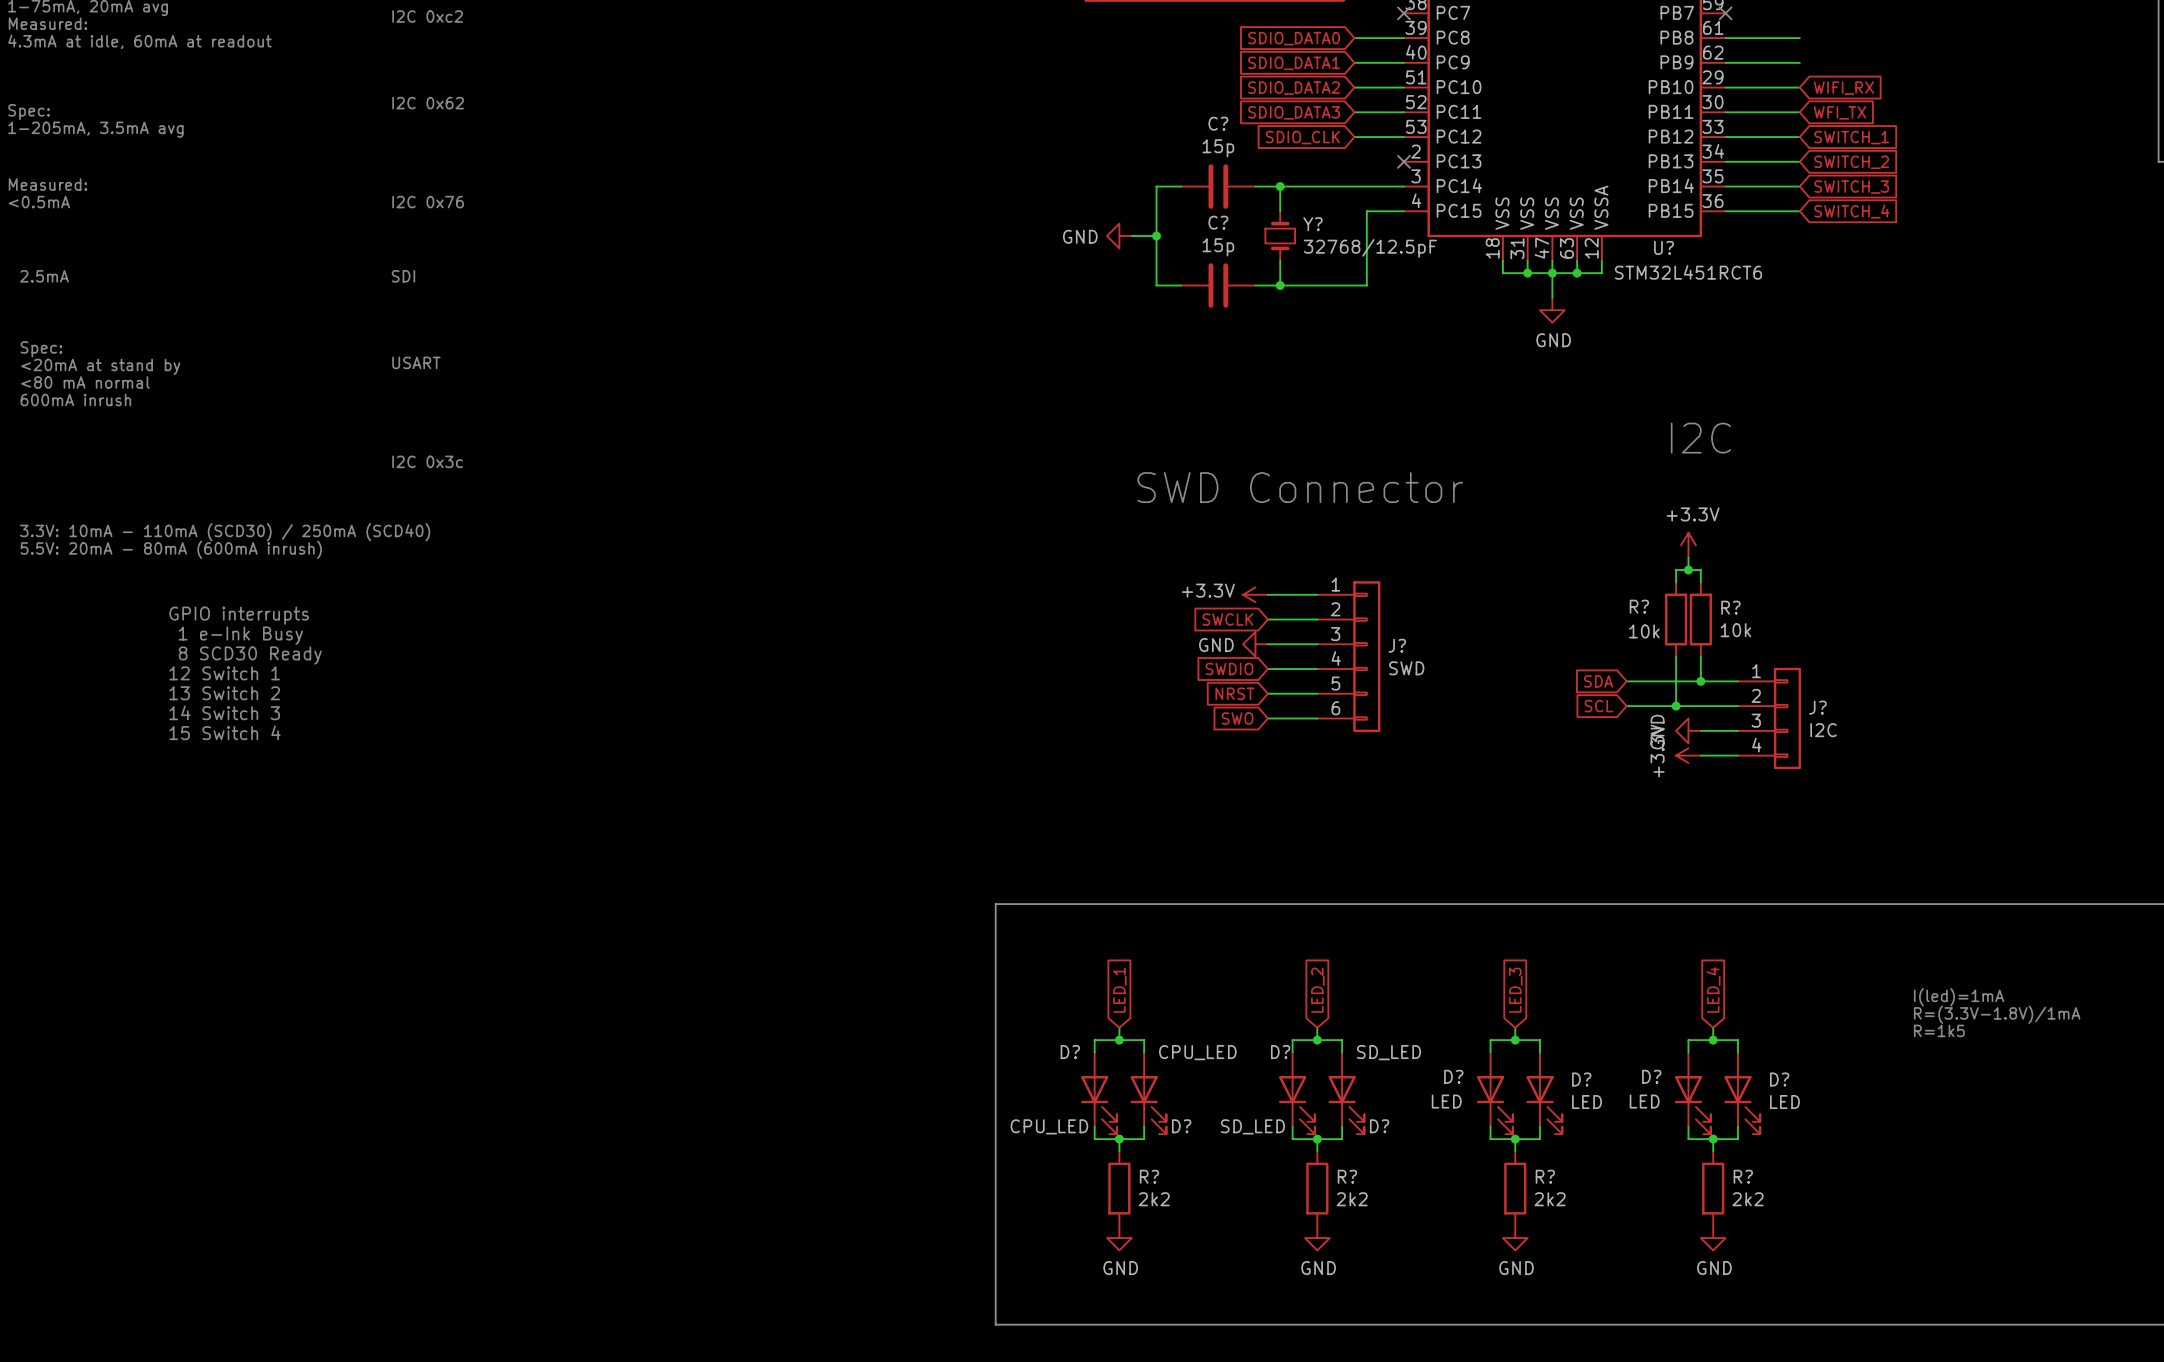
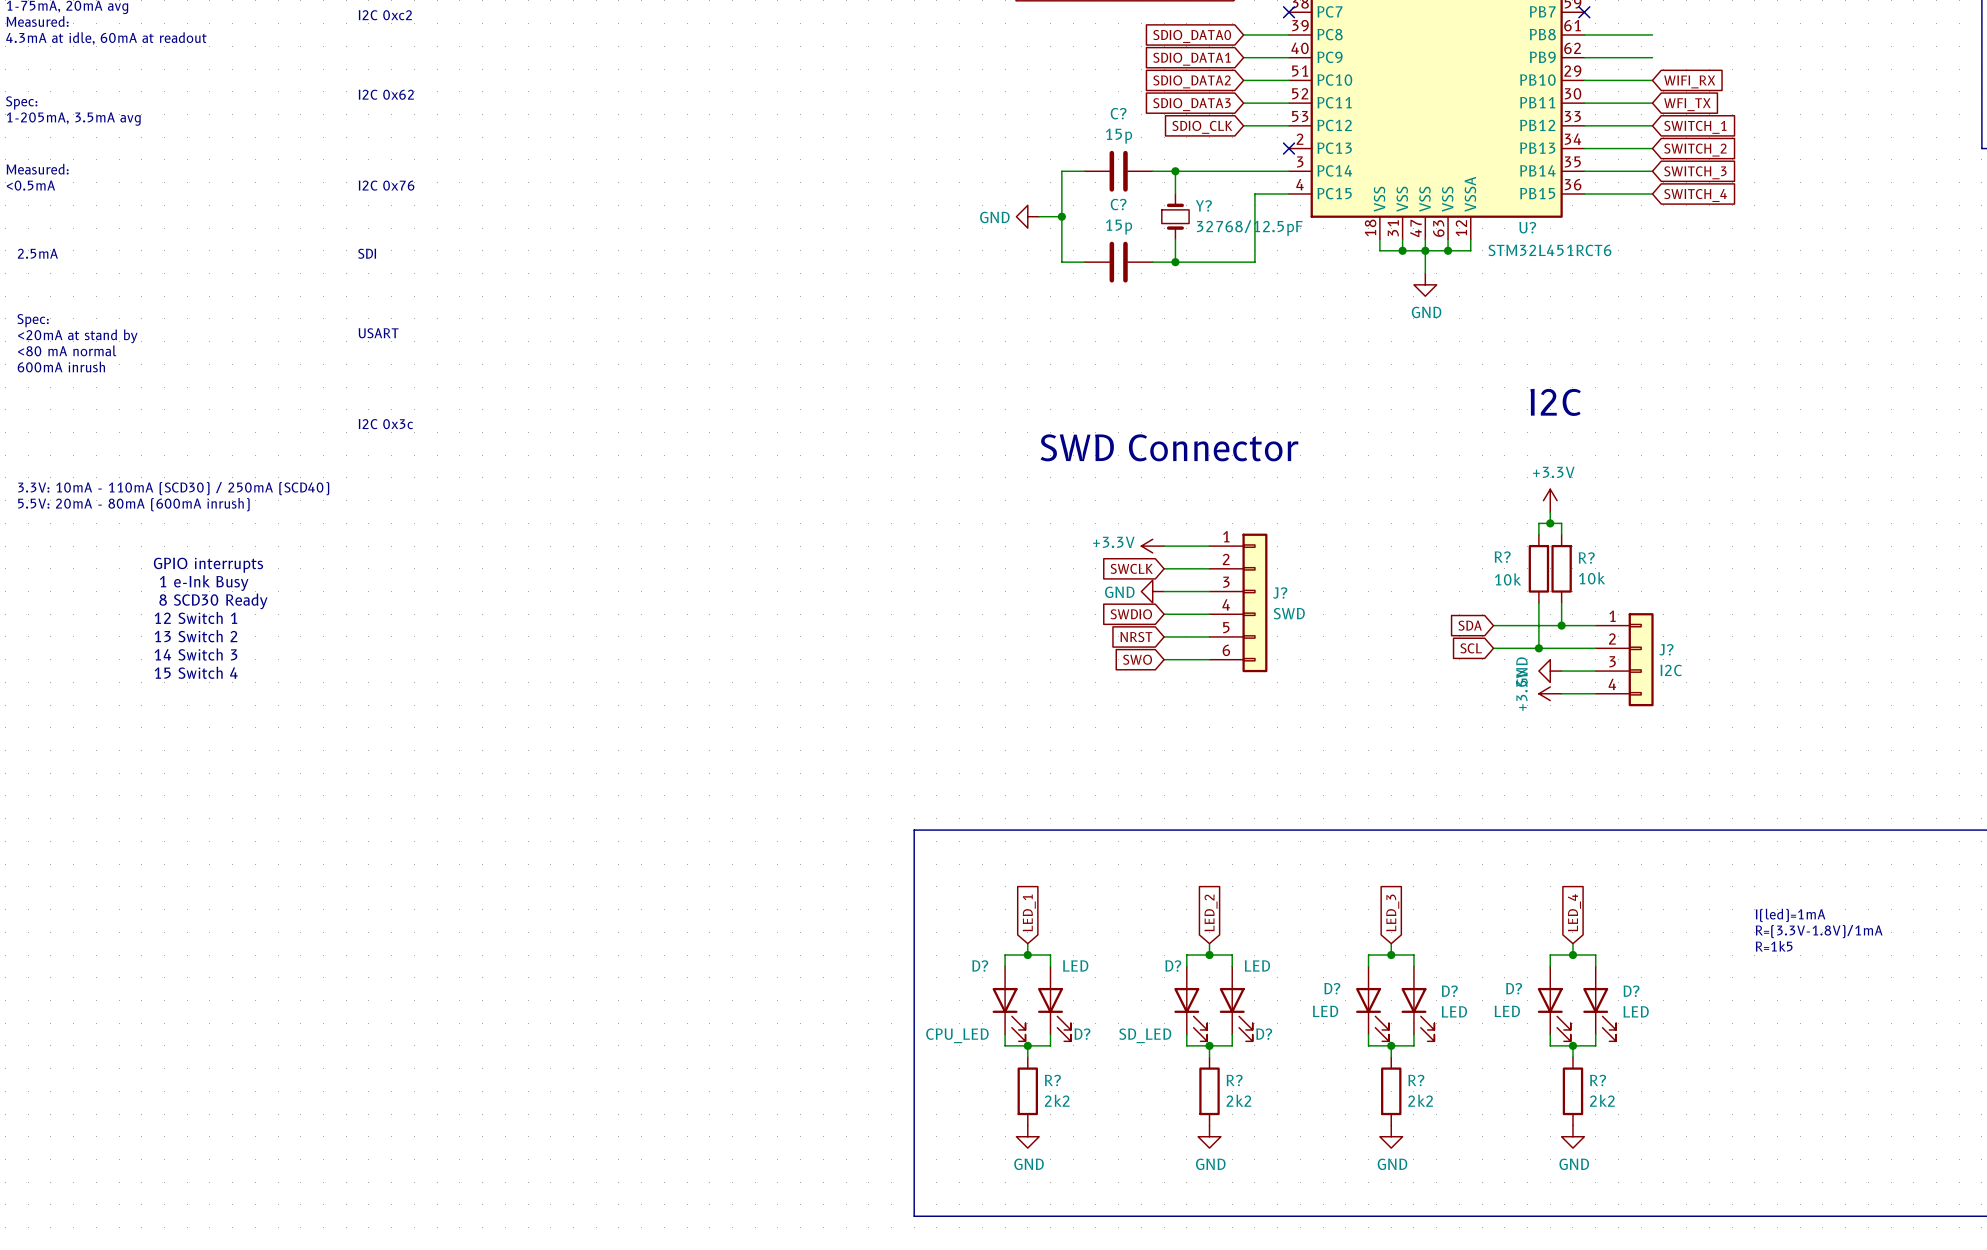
D? value: CPU_LED (1197, 1052) -> LED (1075, 965)
D? value: SD_LED (1389, 1052) -> LED (1257, 965)

